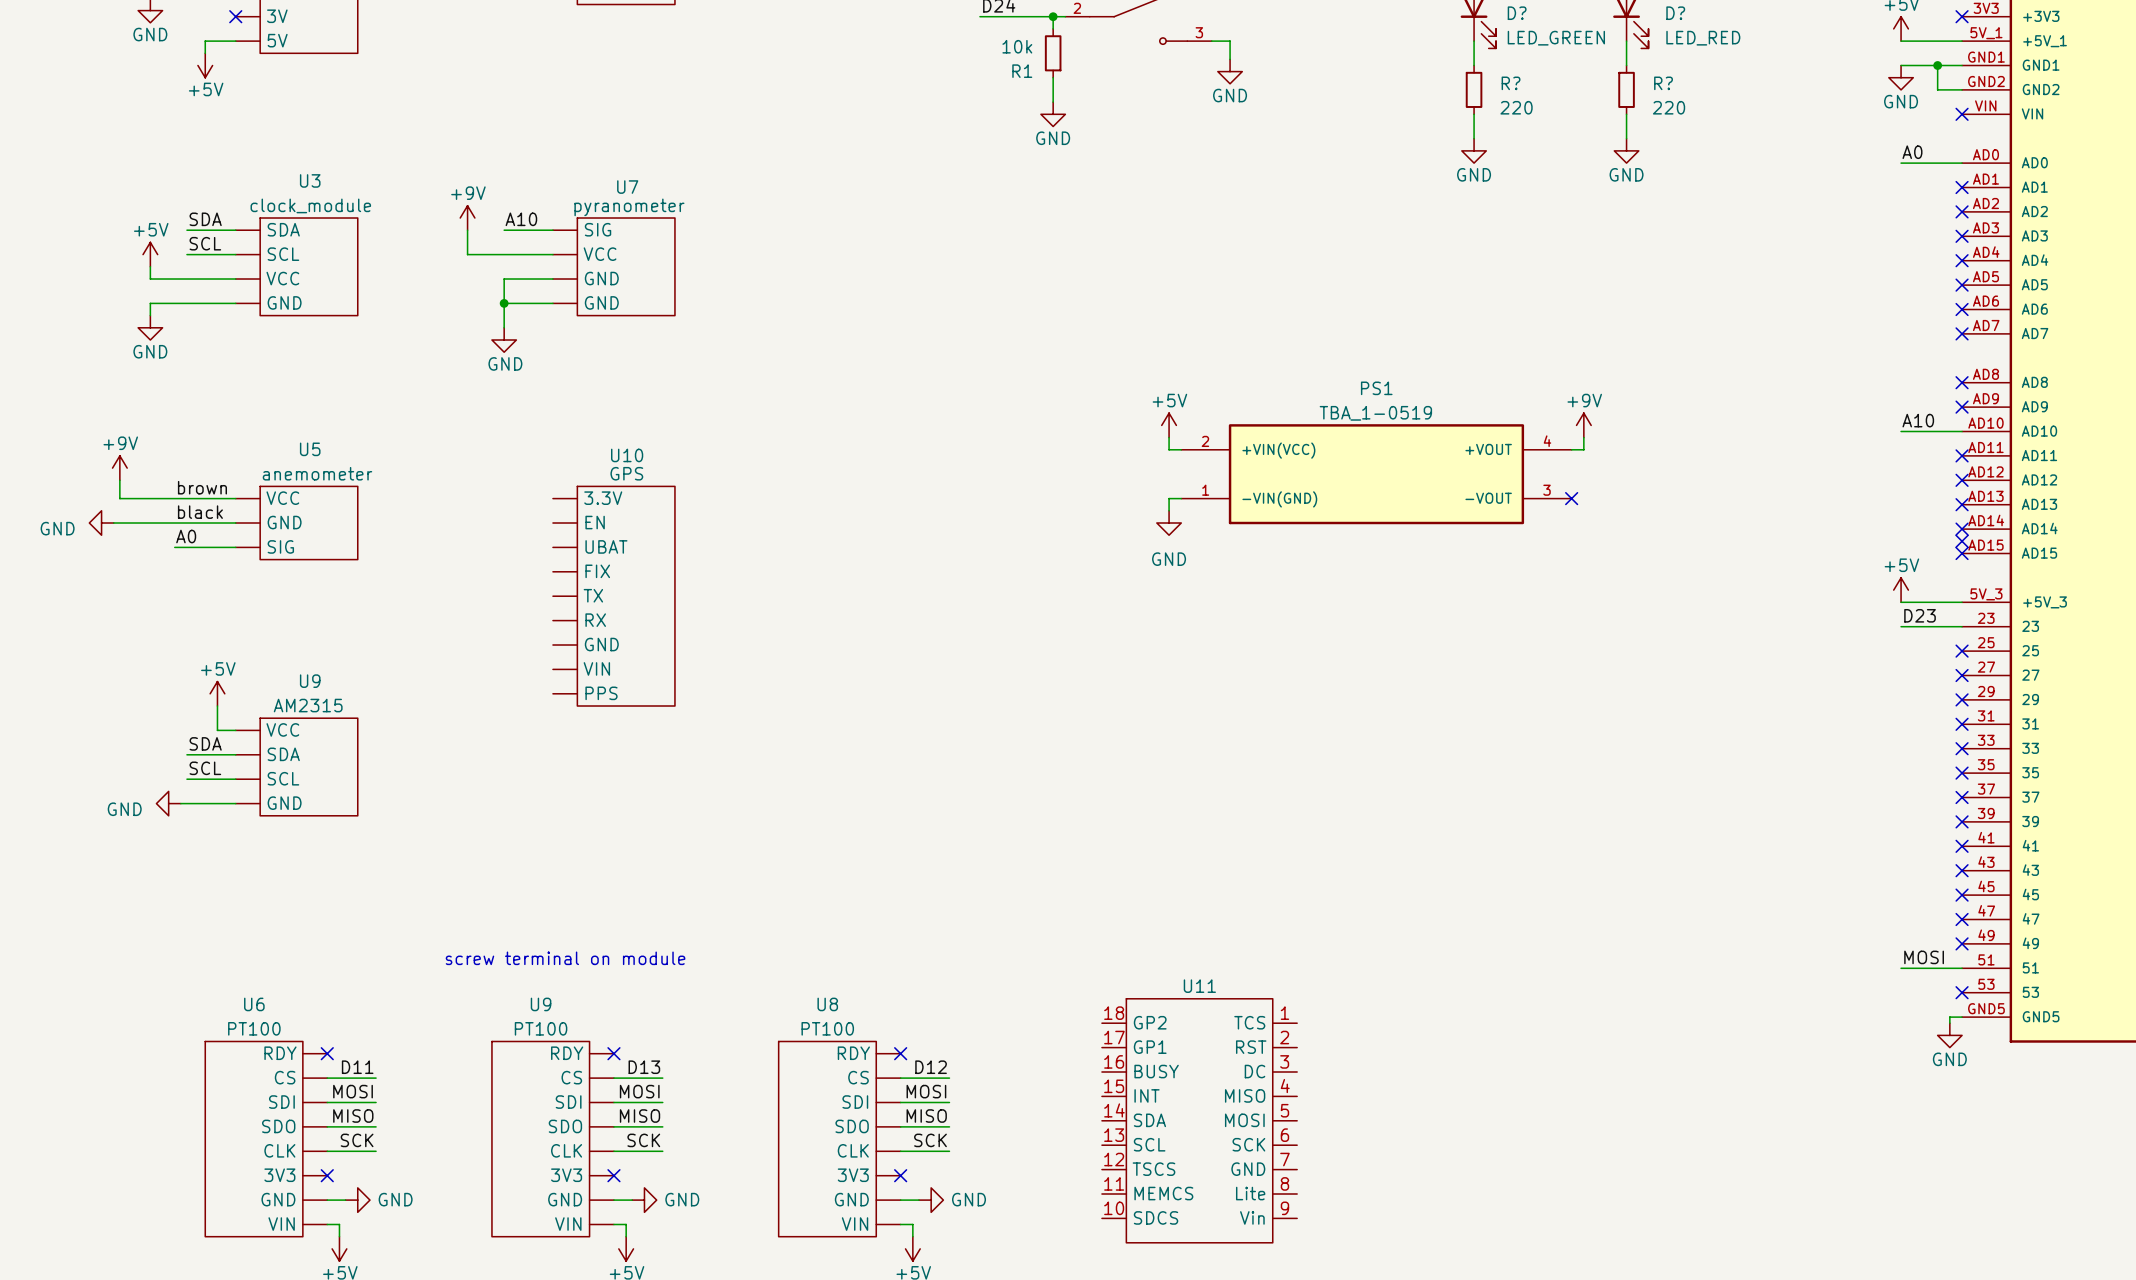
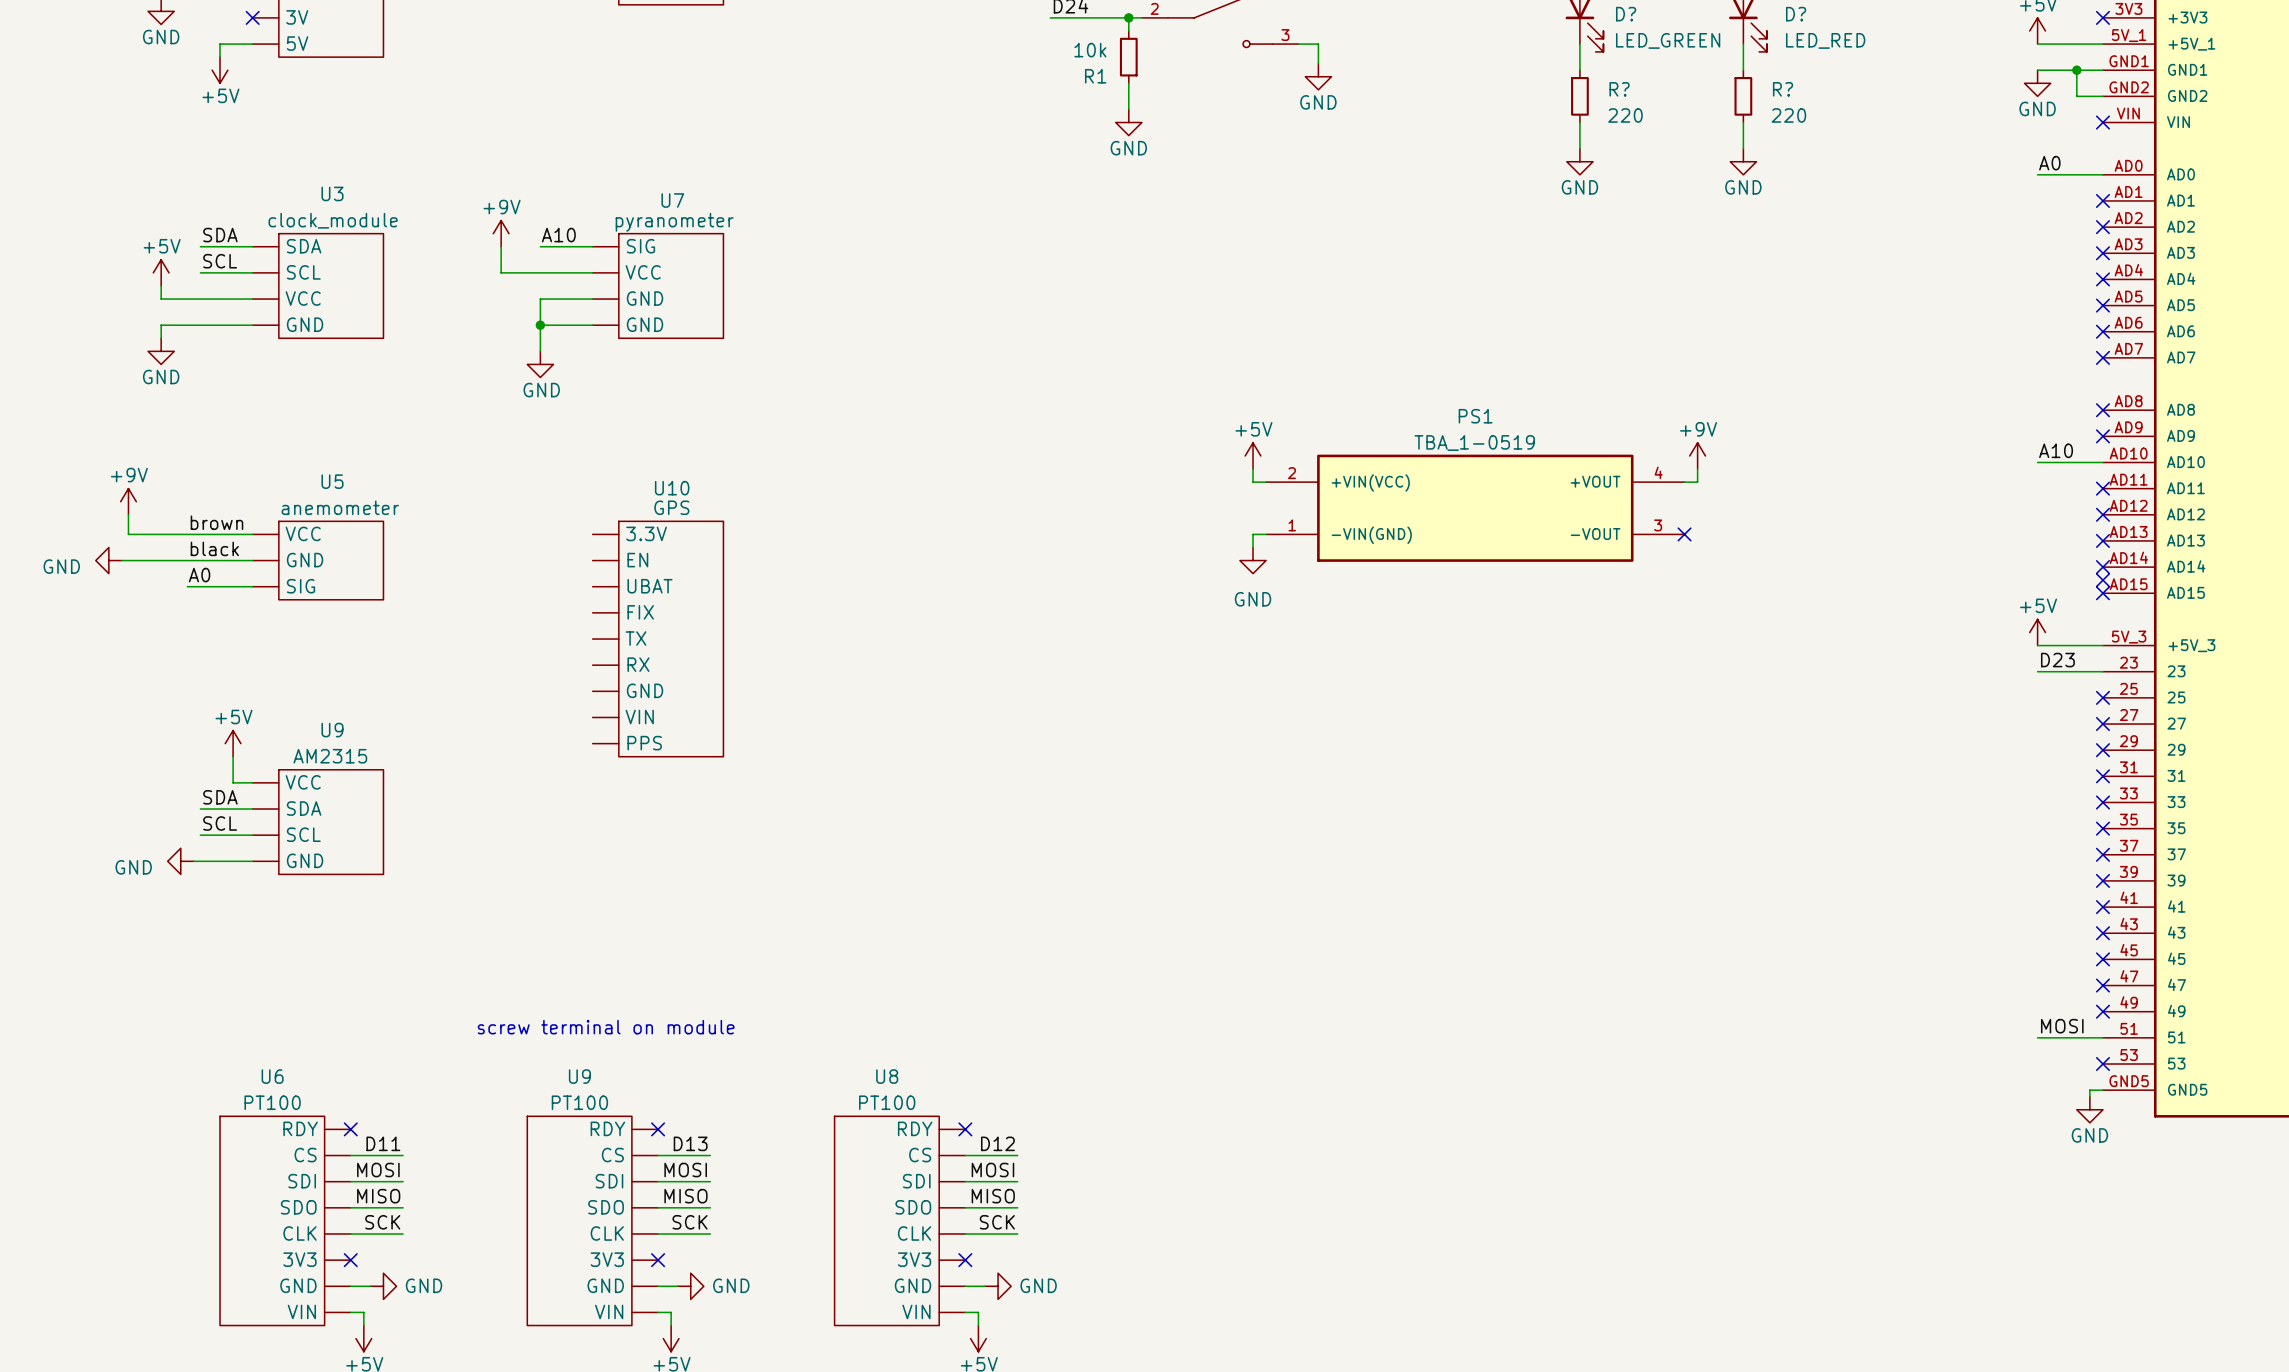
U11: (1199, 1120) -> none

